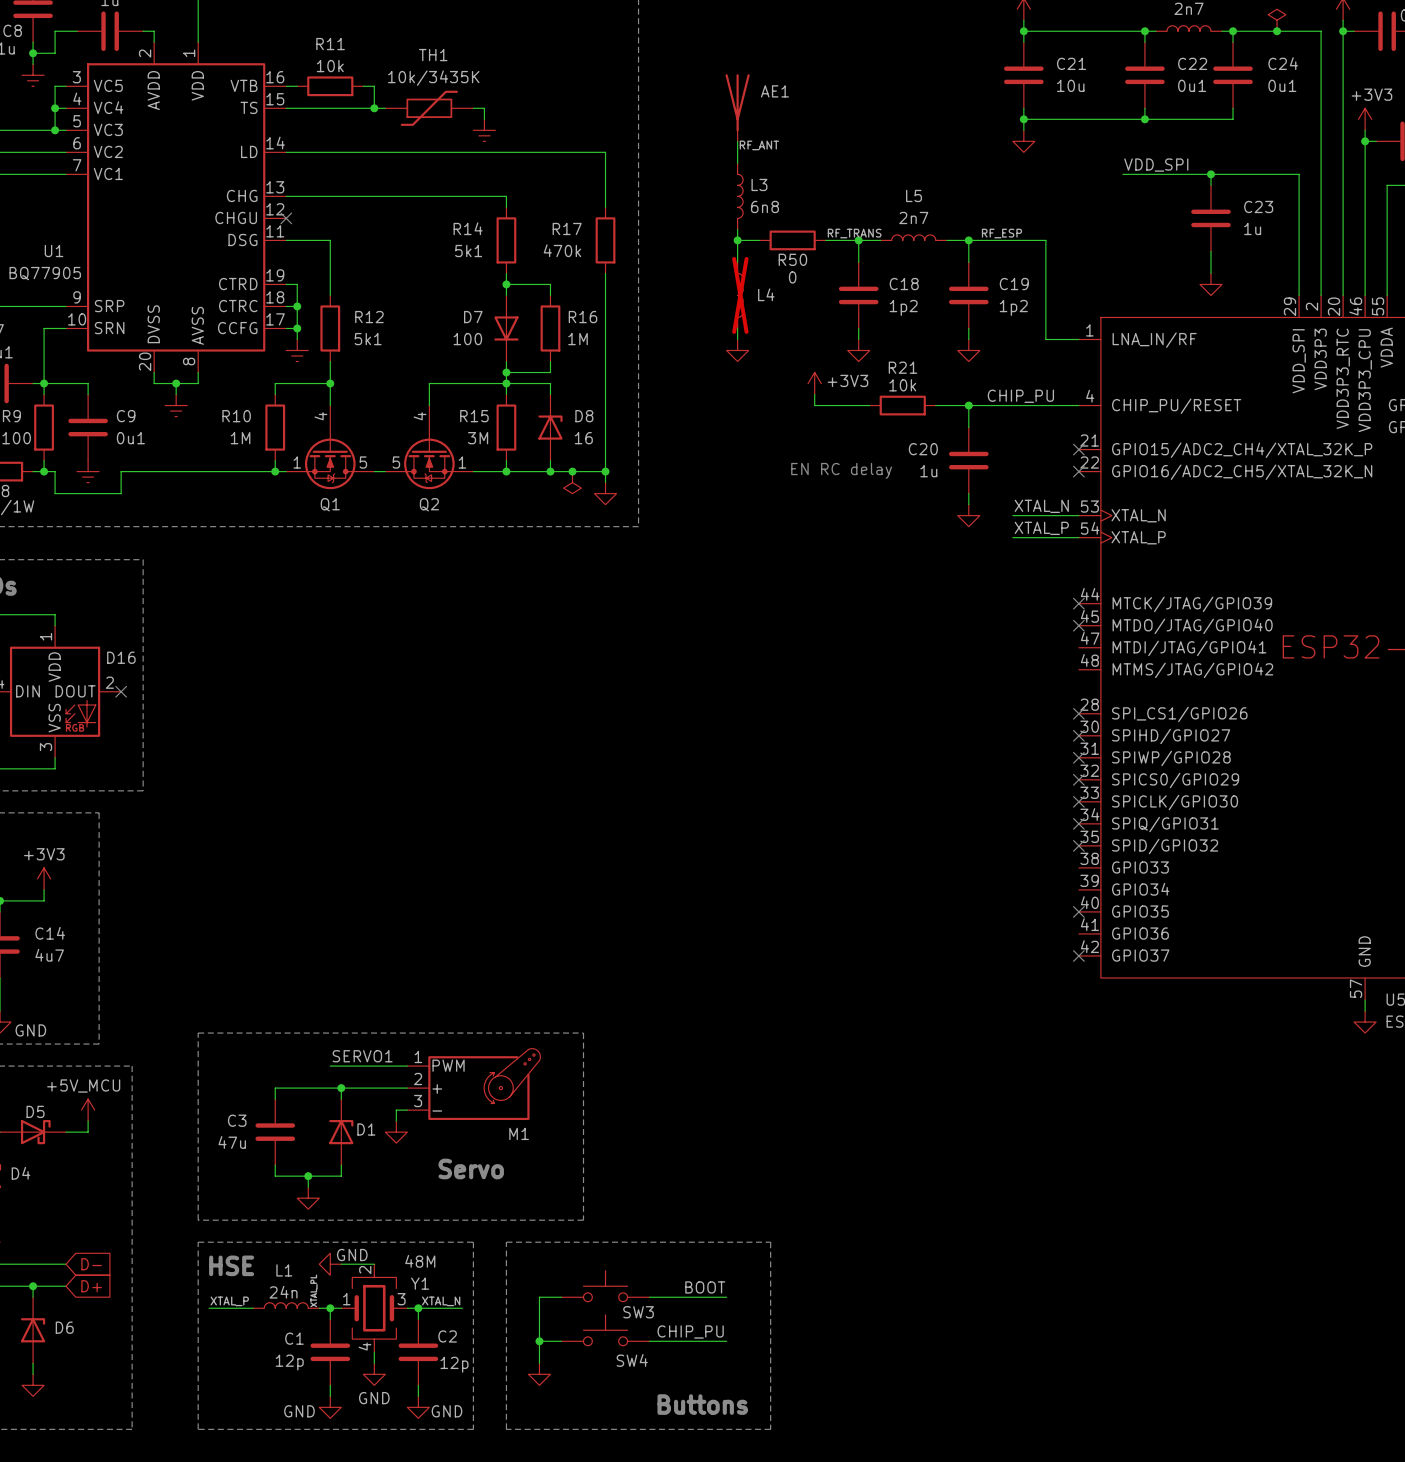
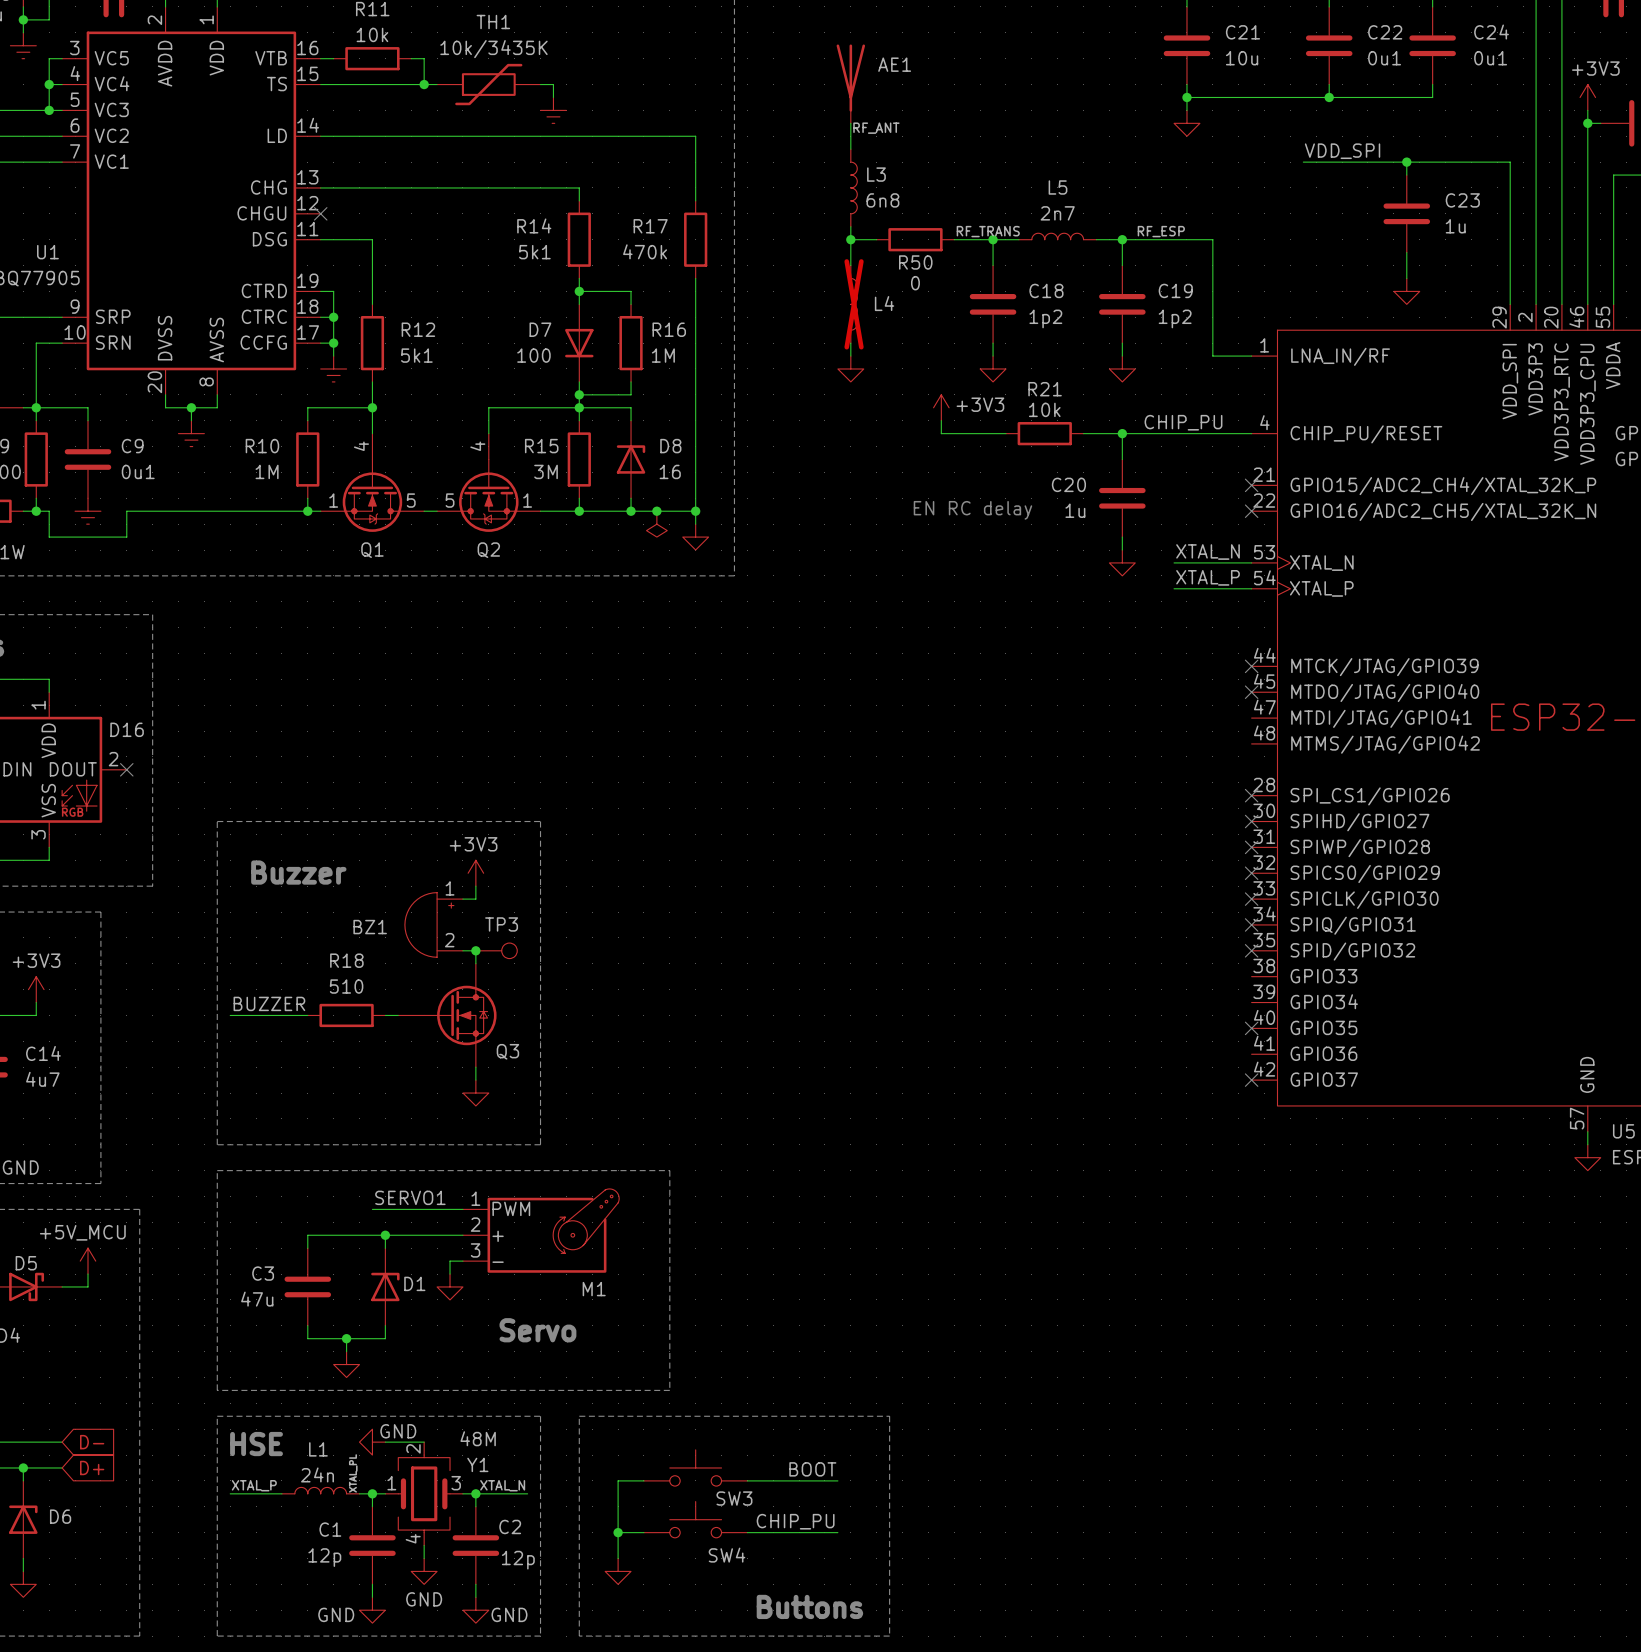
line: none -> (217, 821) (540, 821) (540, 1144) (217, 1144) (217, 821)
text: none -> Buzzer (298, 872)
power symbol: none -> +3V3 (475, 873)
wire: none -> (475, 886) (475, 899) (462, 899)
BZ1: none -> (433, 924)
wire: none -> (462, 950) (475, 950) (475, 963)
junction: none -> (475, 950)
TP3: none -> (496, 950)
label: none -> BUZZER (269, 1003)
wire: none -> (230, 1015) (307, 1015)
R18: none -> 510 (346, 1015)
wire: none -> (385, 1015) (398, 1015)
Q3: none -> (447, 1015)
wire: none -> (475, 1067) (475, 1080)
power symbol: none -> (475, 1093)

